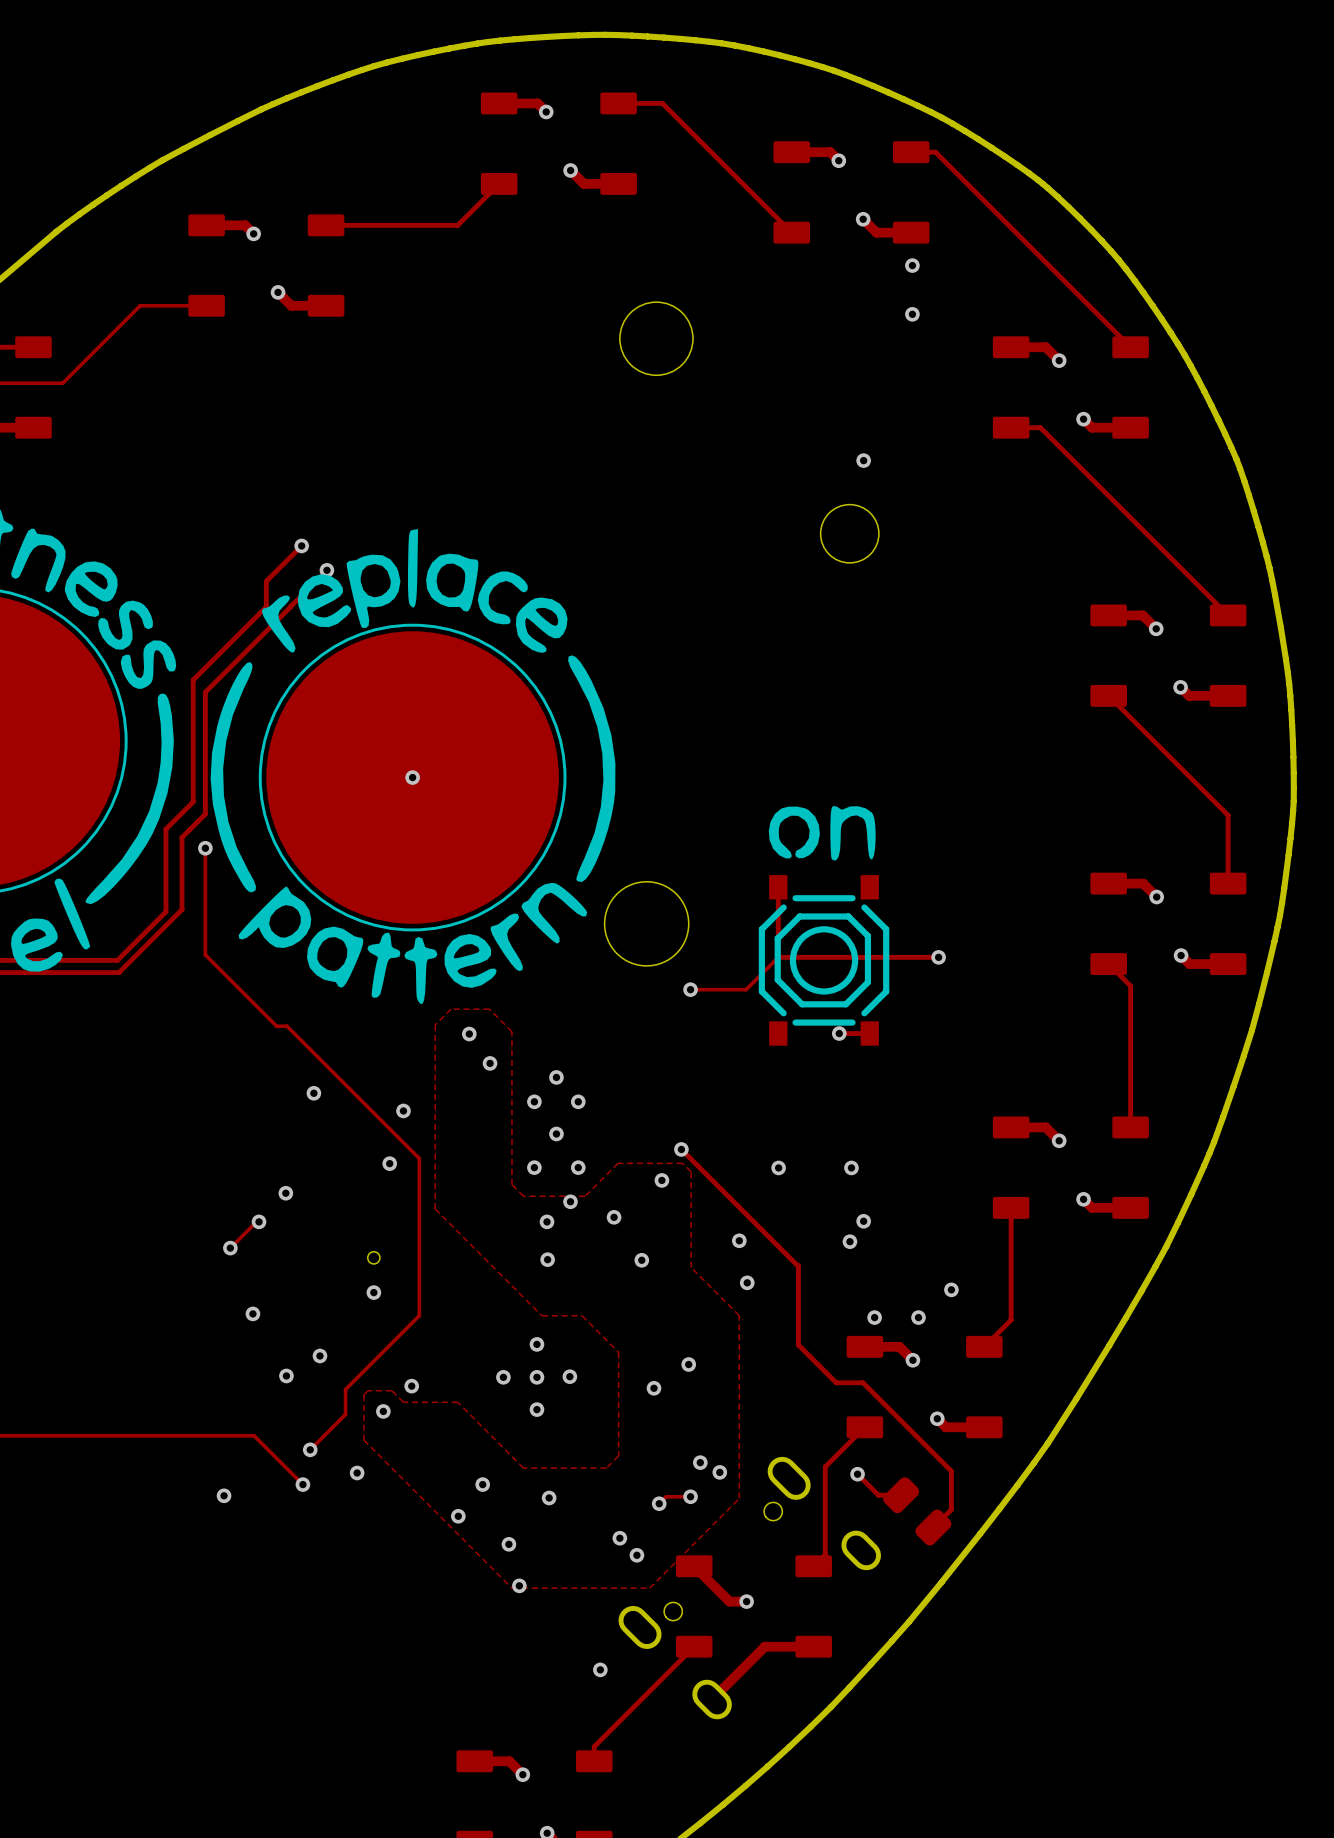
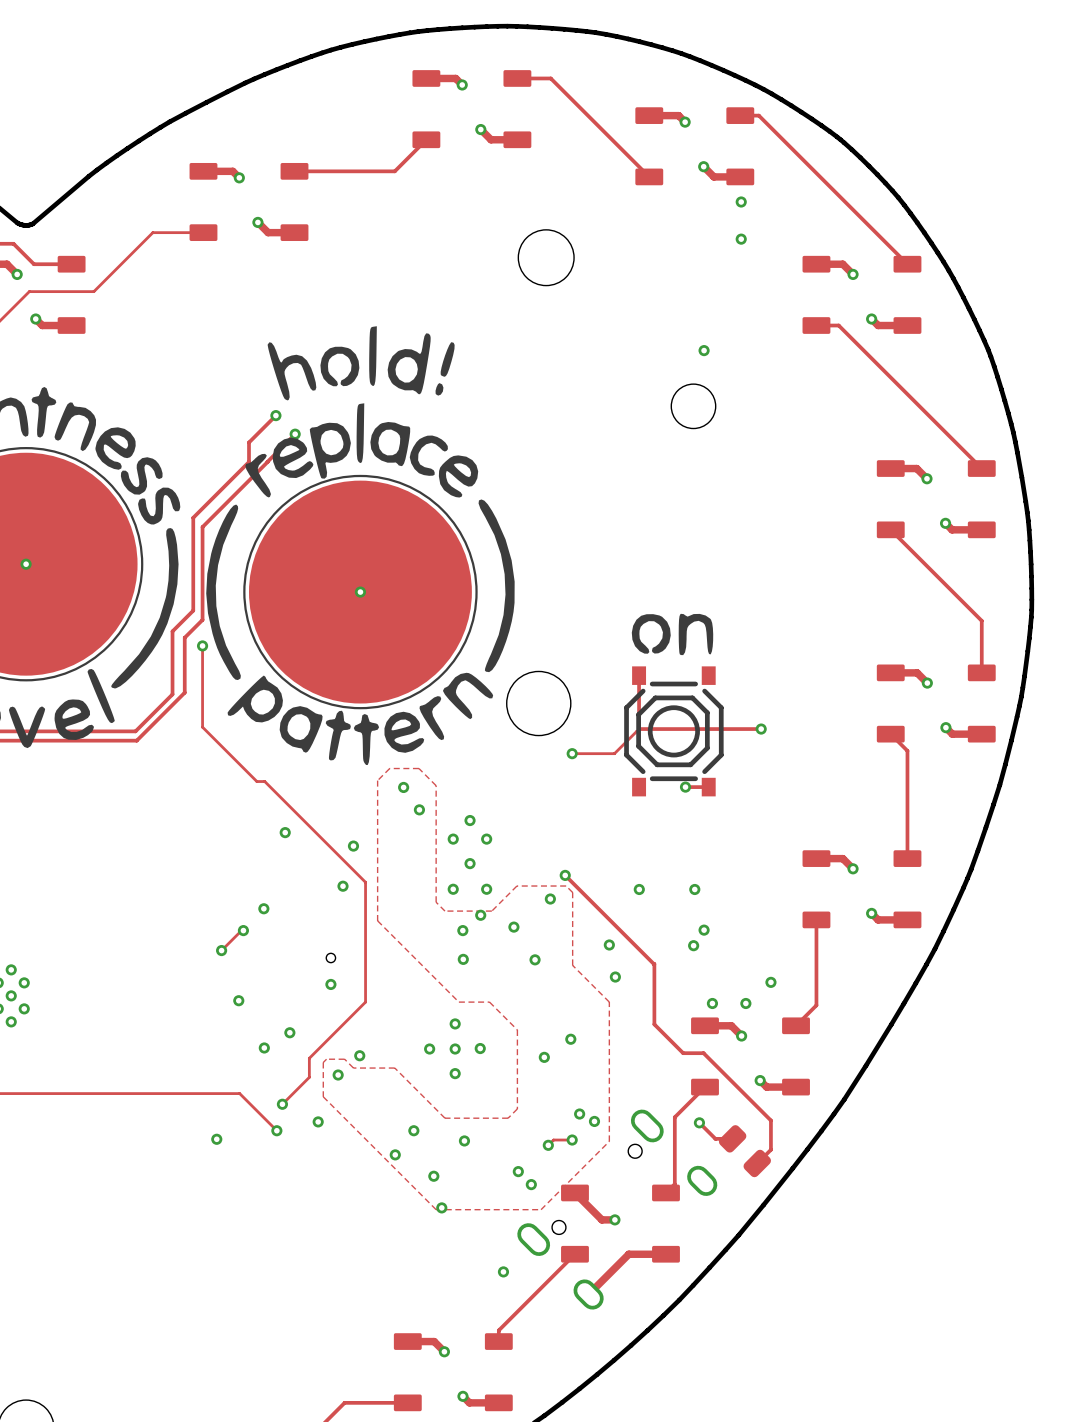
drawing: none -> [206, 326, 515, 766]
drawing: [210, 529, 616, 1004] -> none

